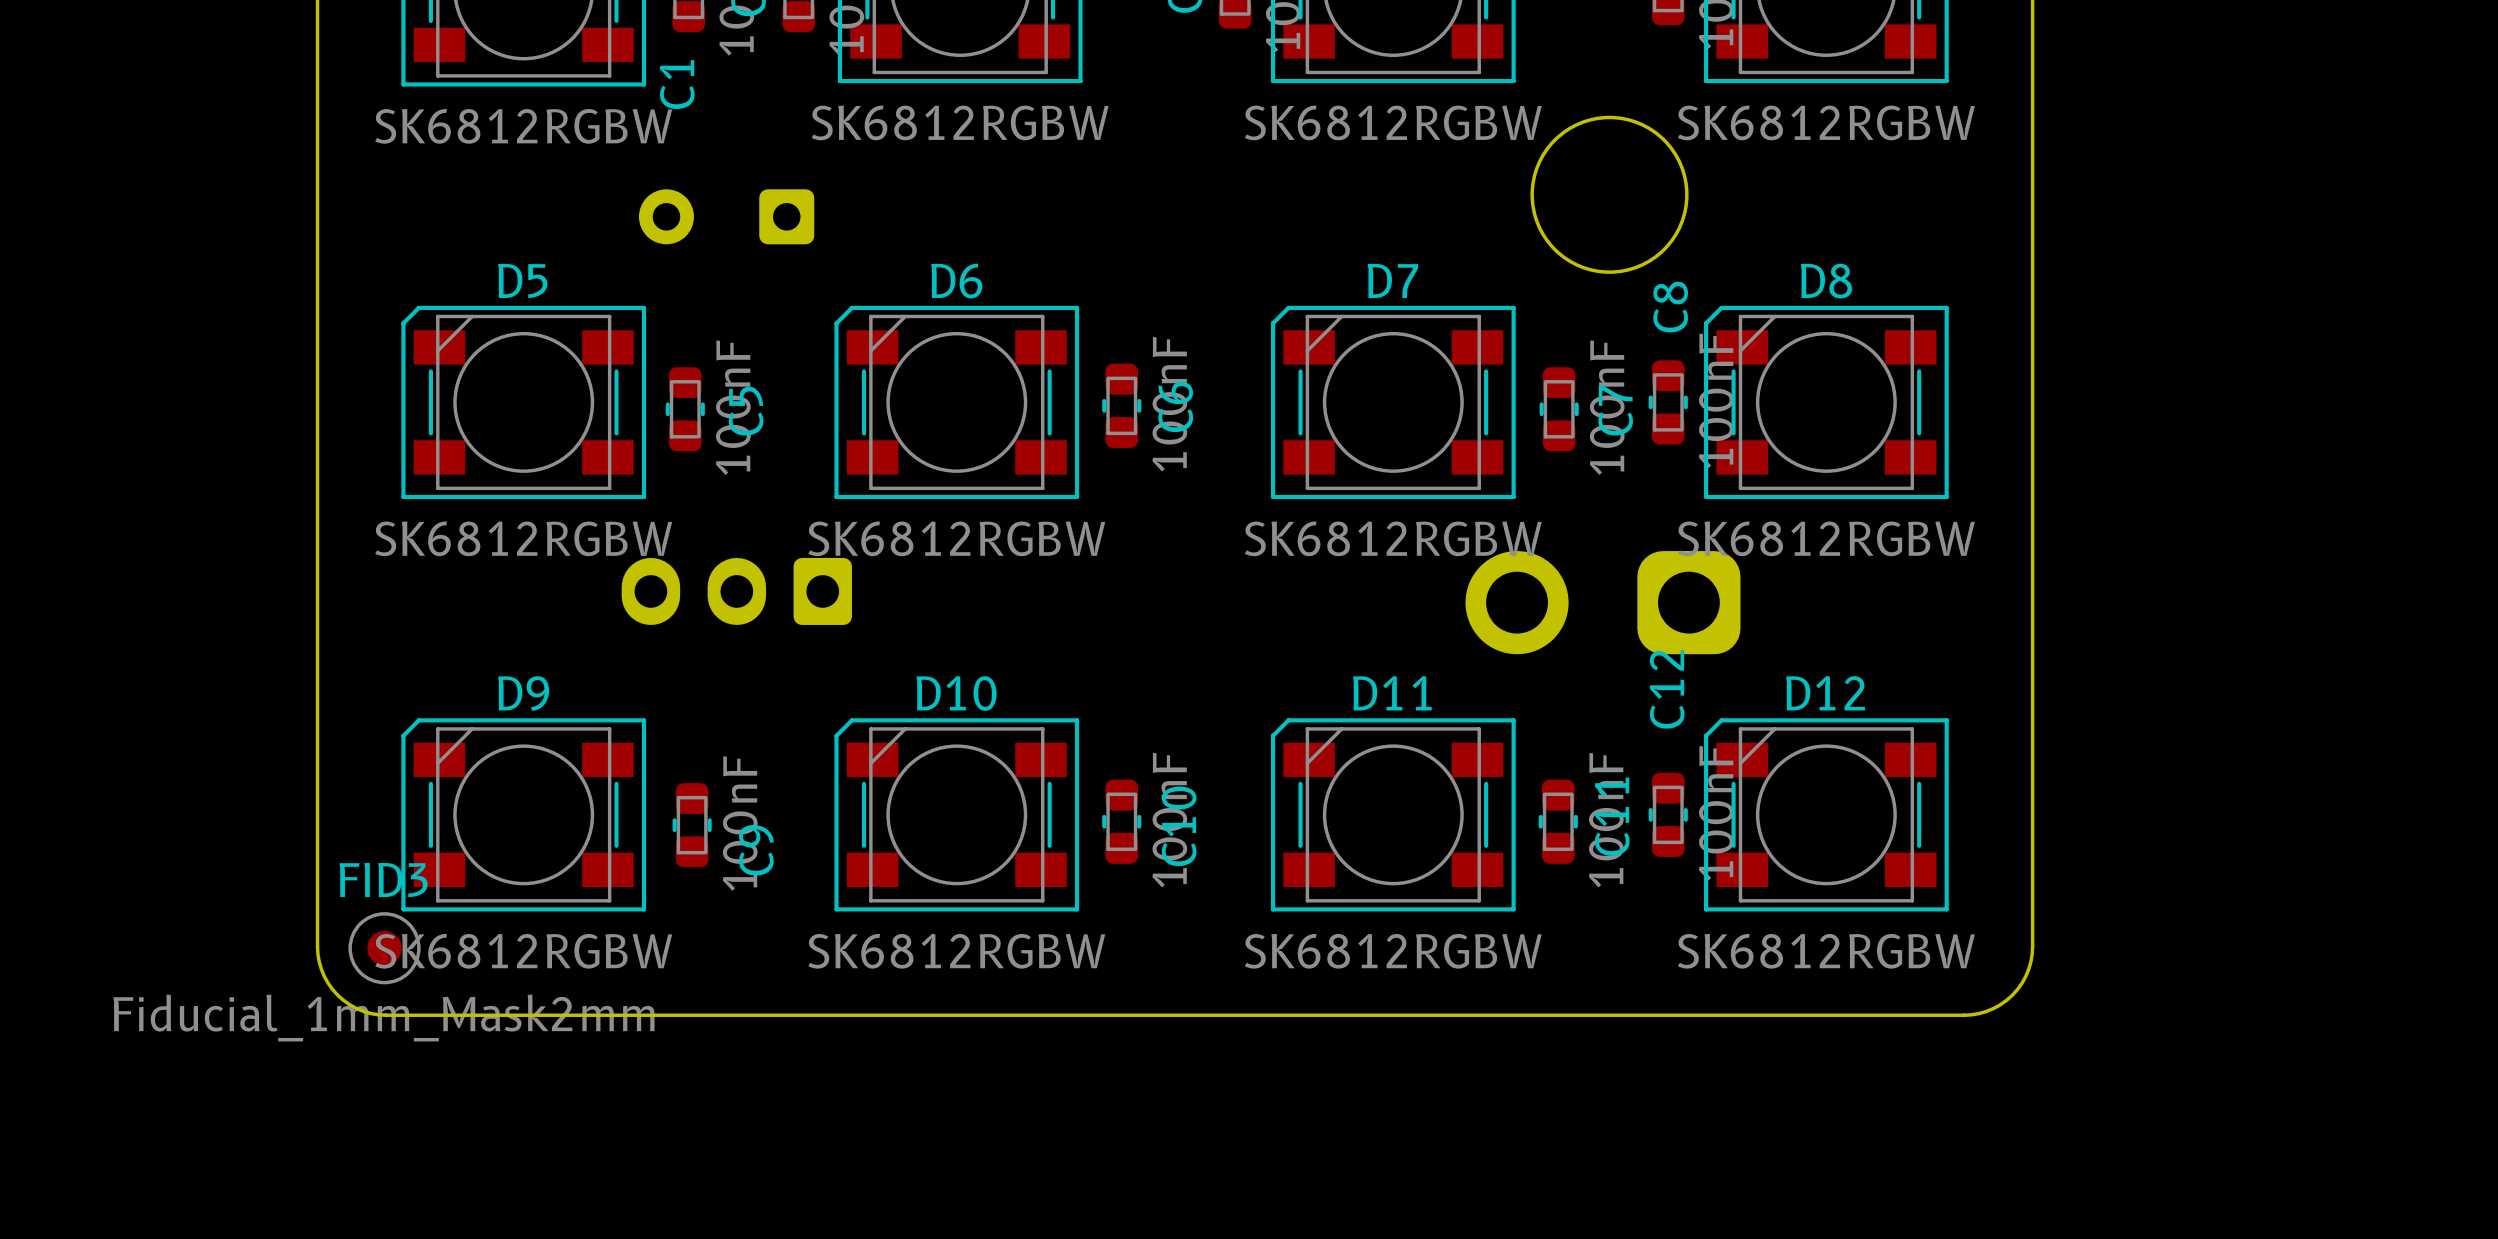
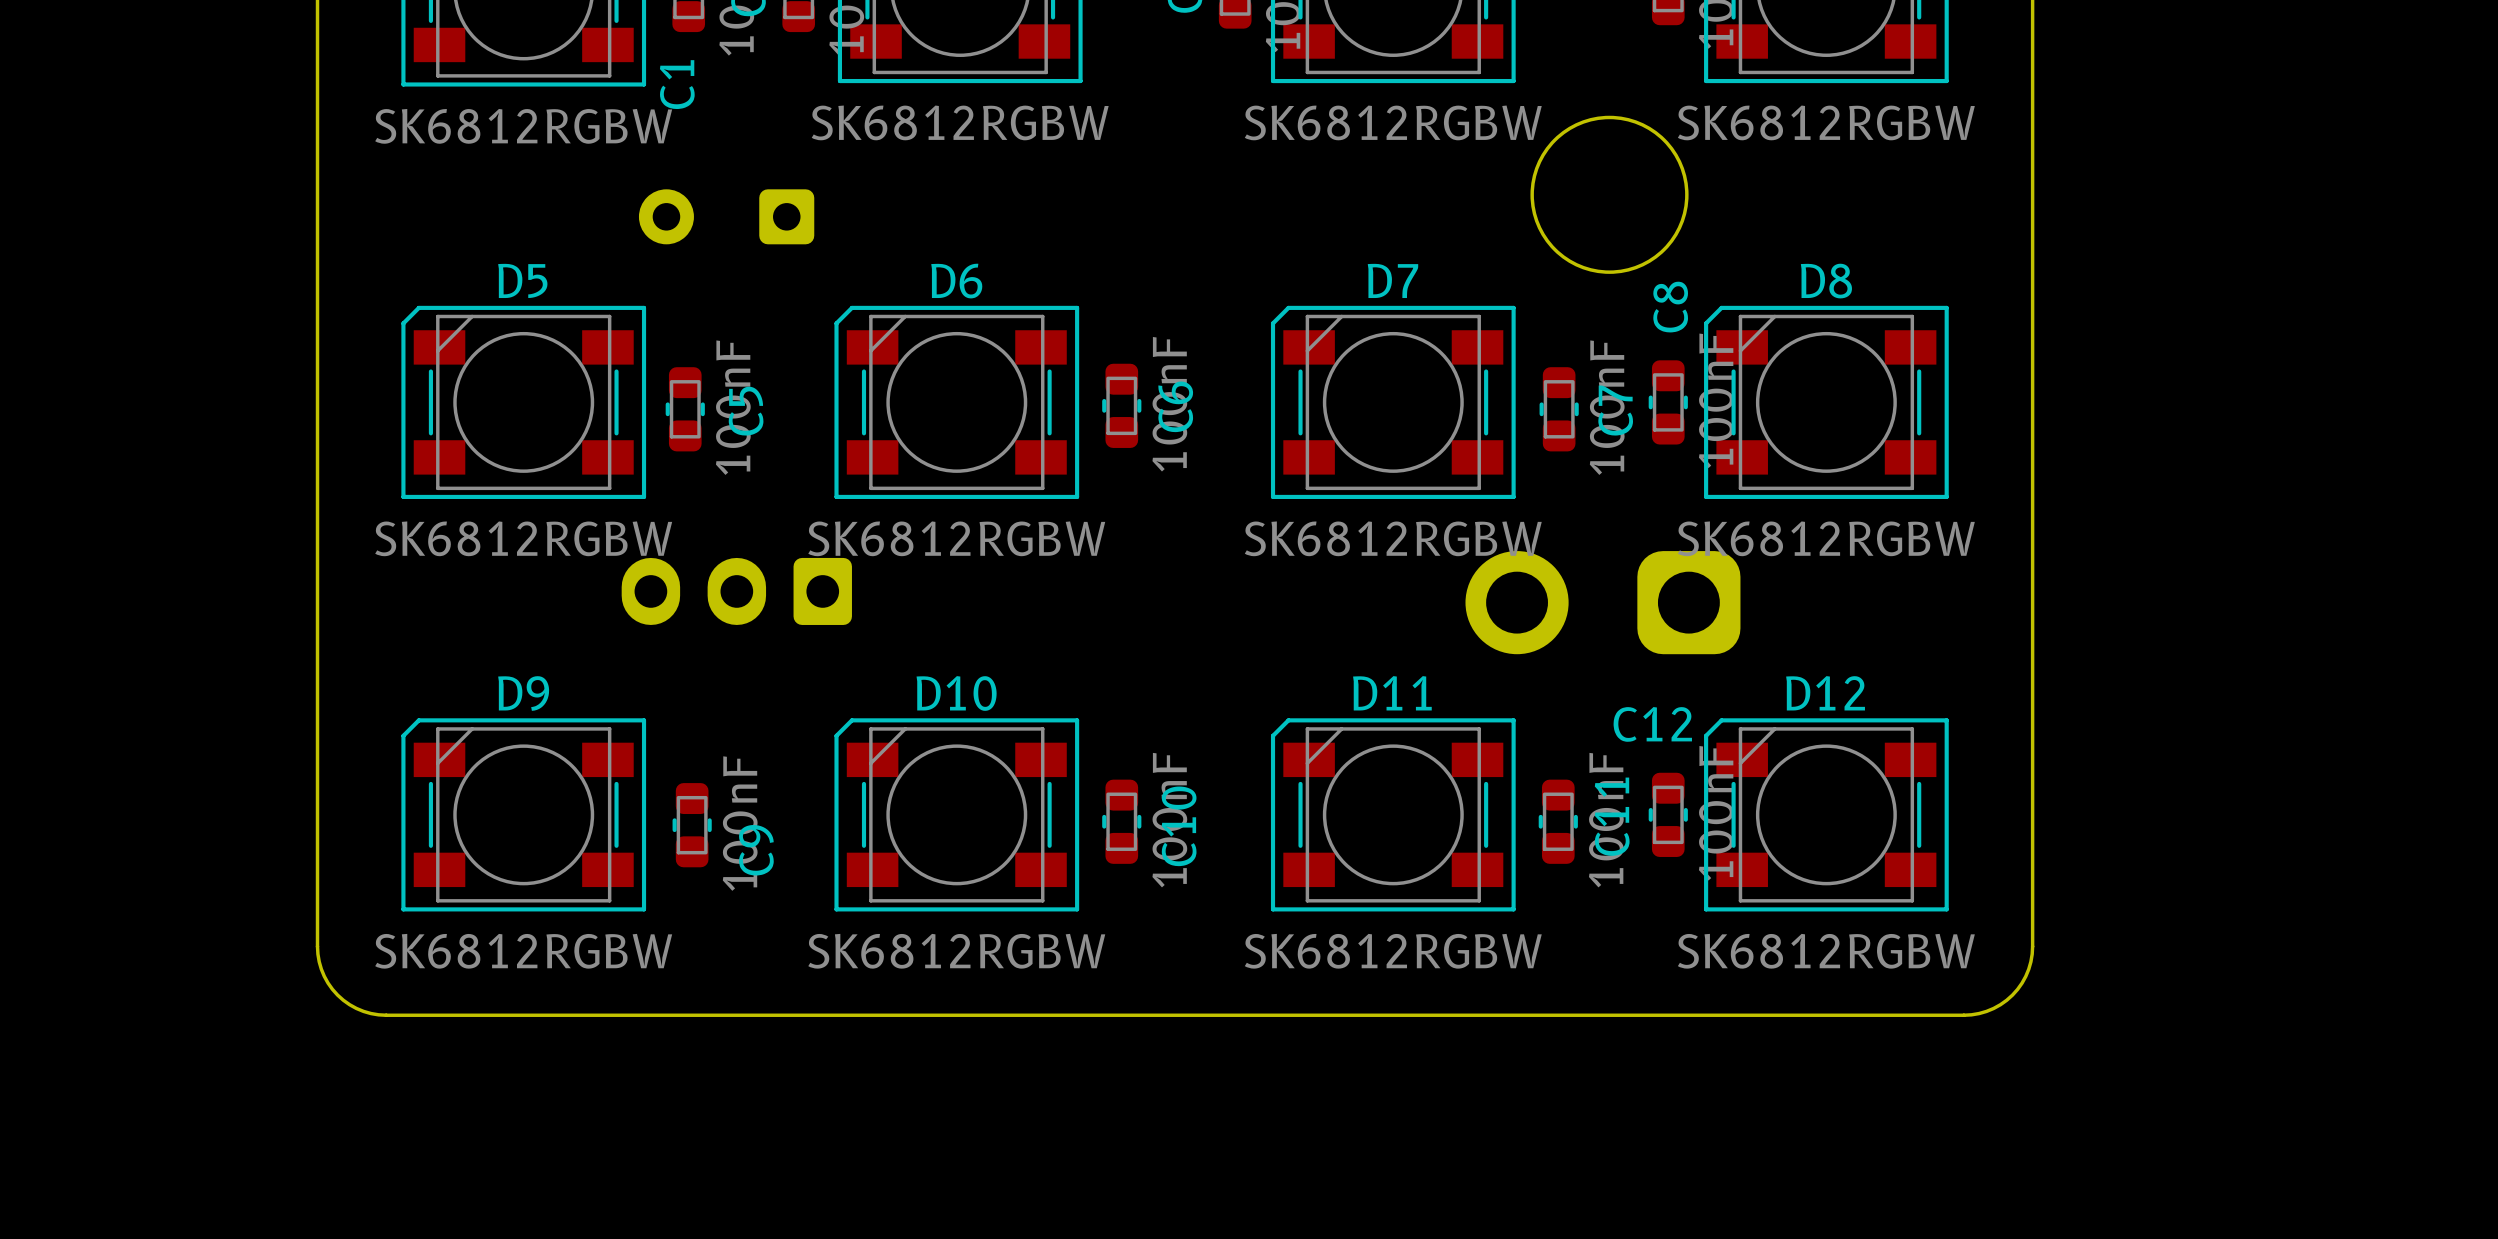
C12 name rotation: 0° (1667, 689) -> 90° clockwise (1652, 724)
FID3: Fiducial_1mm_Mask2mm (384, 948) -> none

